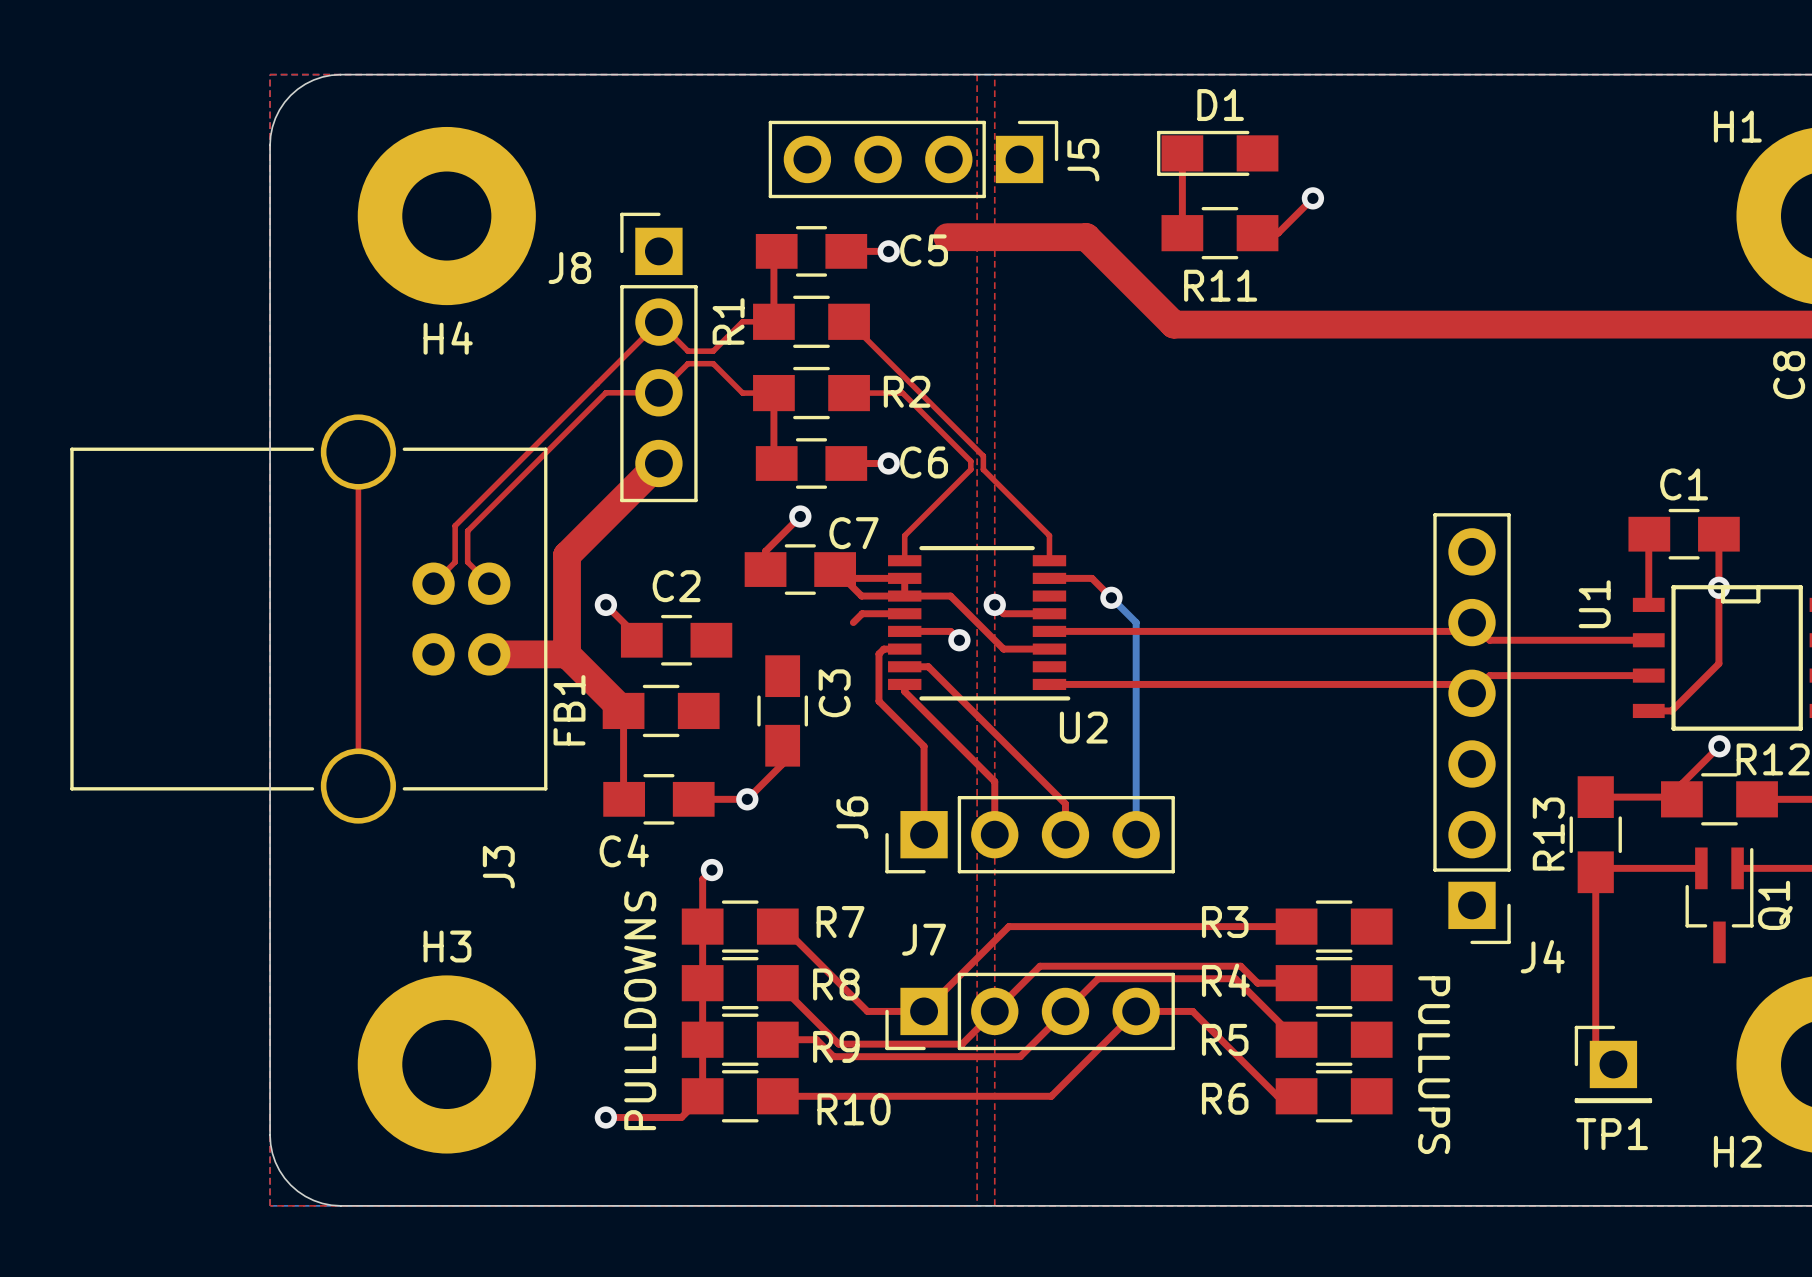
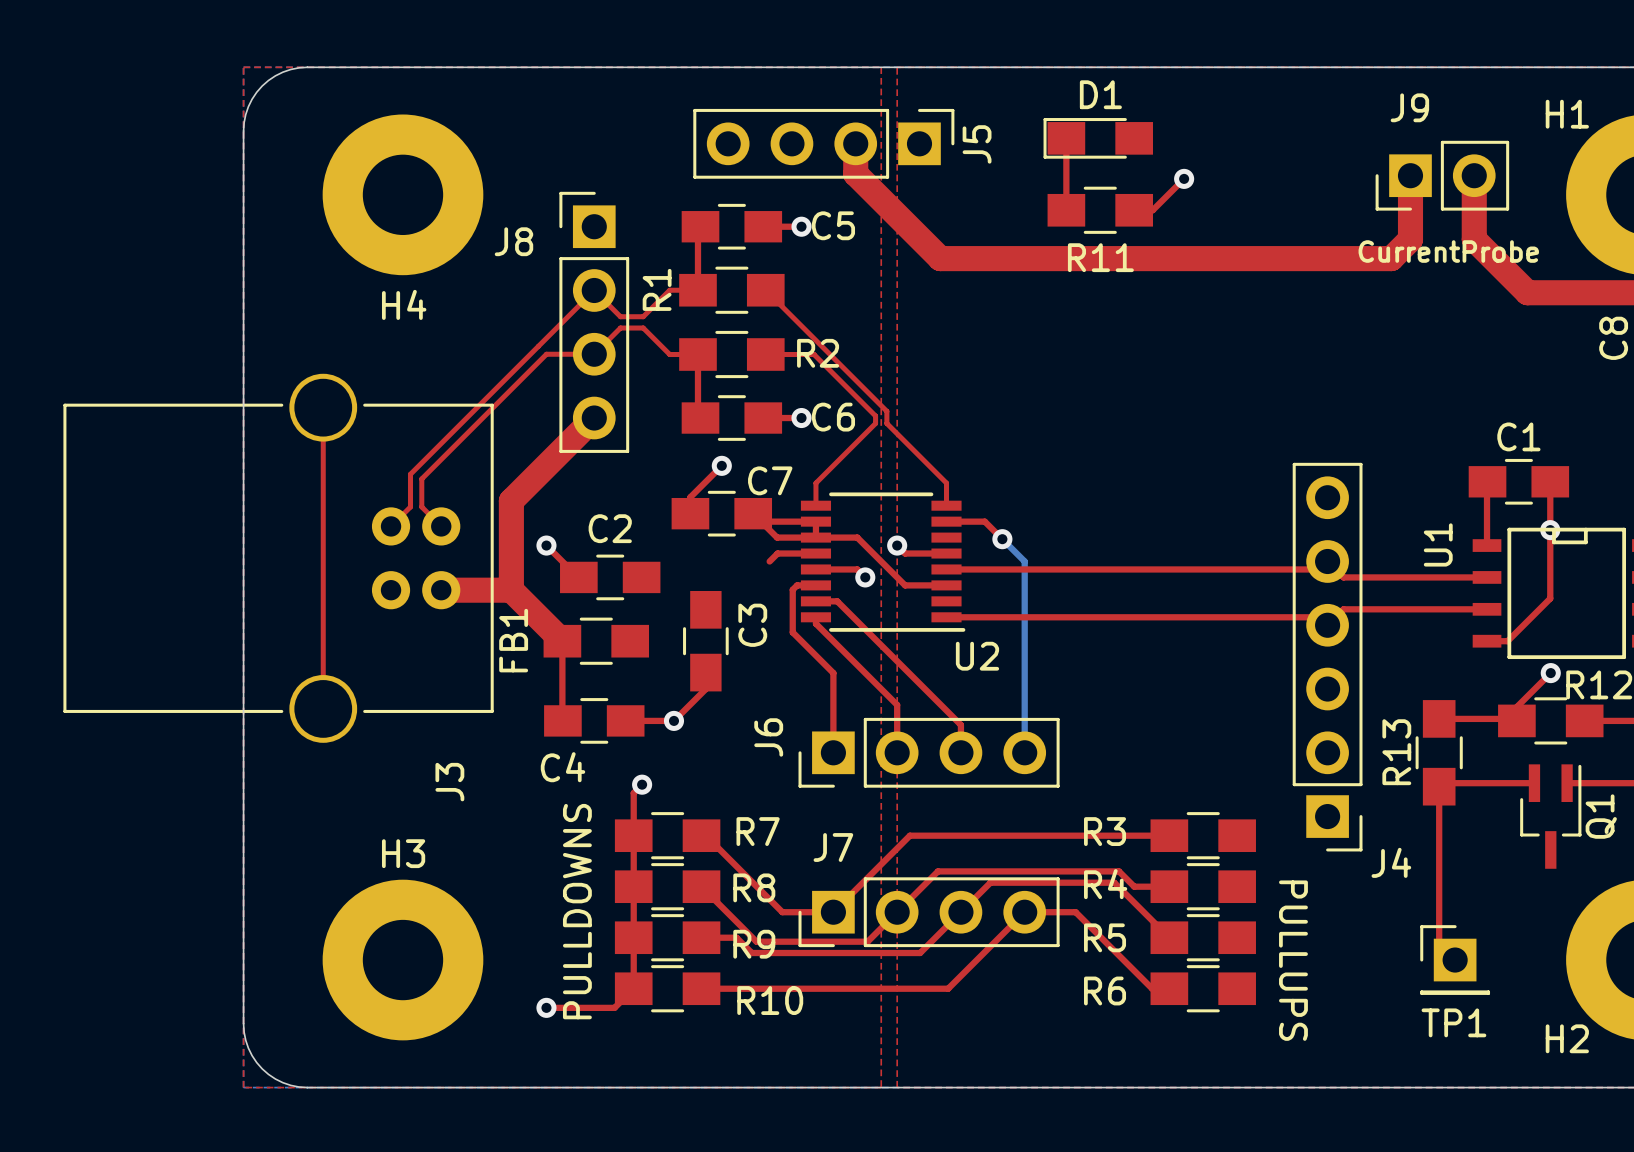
top track: none -> (855, 143) (855, 174) (940, 258) (1391, 258) (1410, 239) (1410, 175)
J9: none -> (1442, 175)
top track: (947, 237) (1086, 237) (1173, 324) (1693, 324) -> (1474, 175) (1474, 239) (1527, 292)
text: none -> CurrentProbe (1448, 251)

